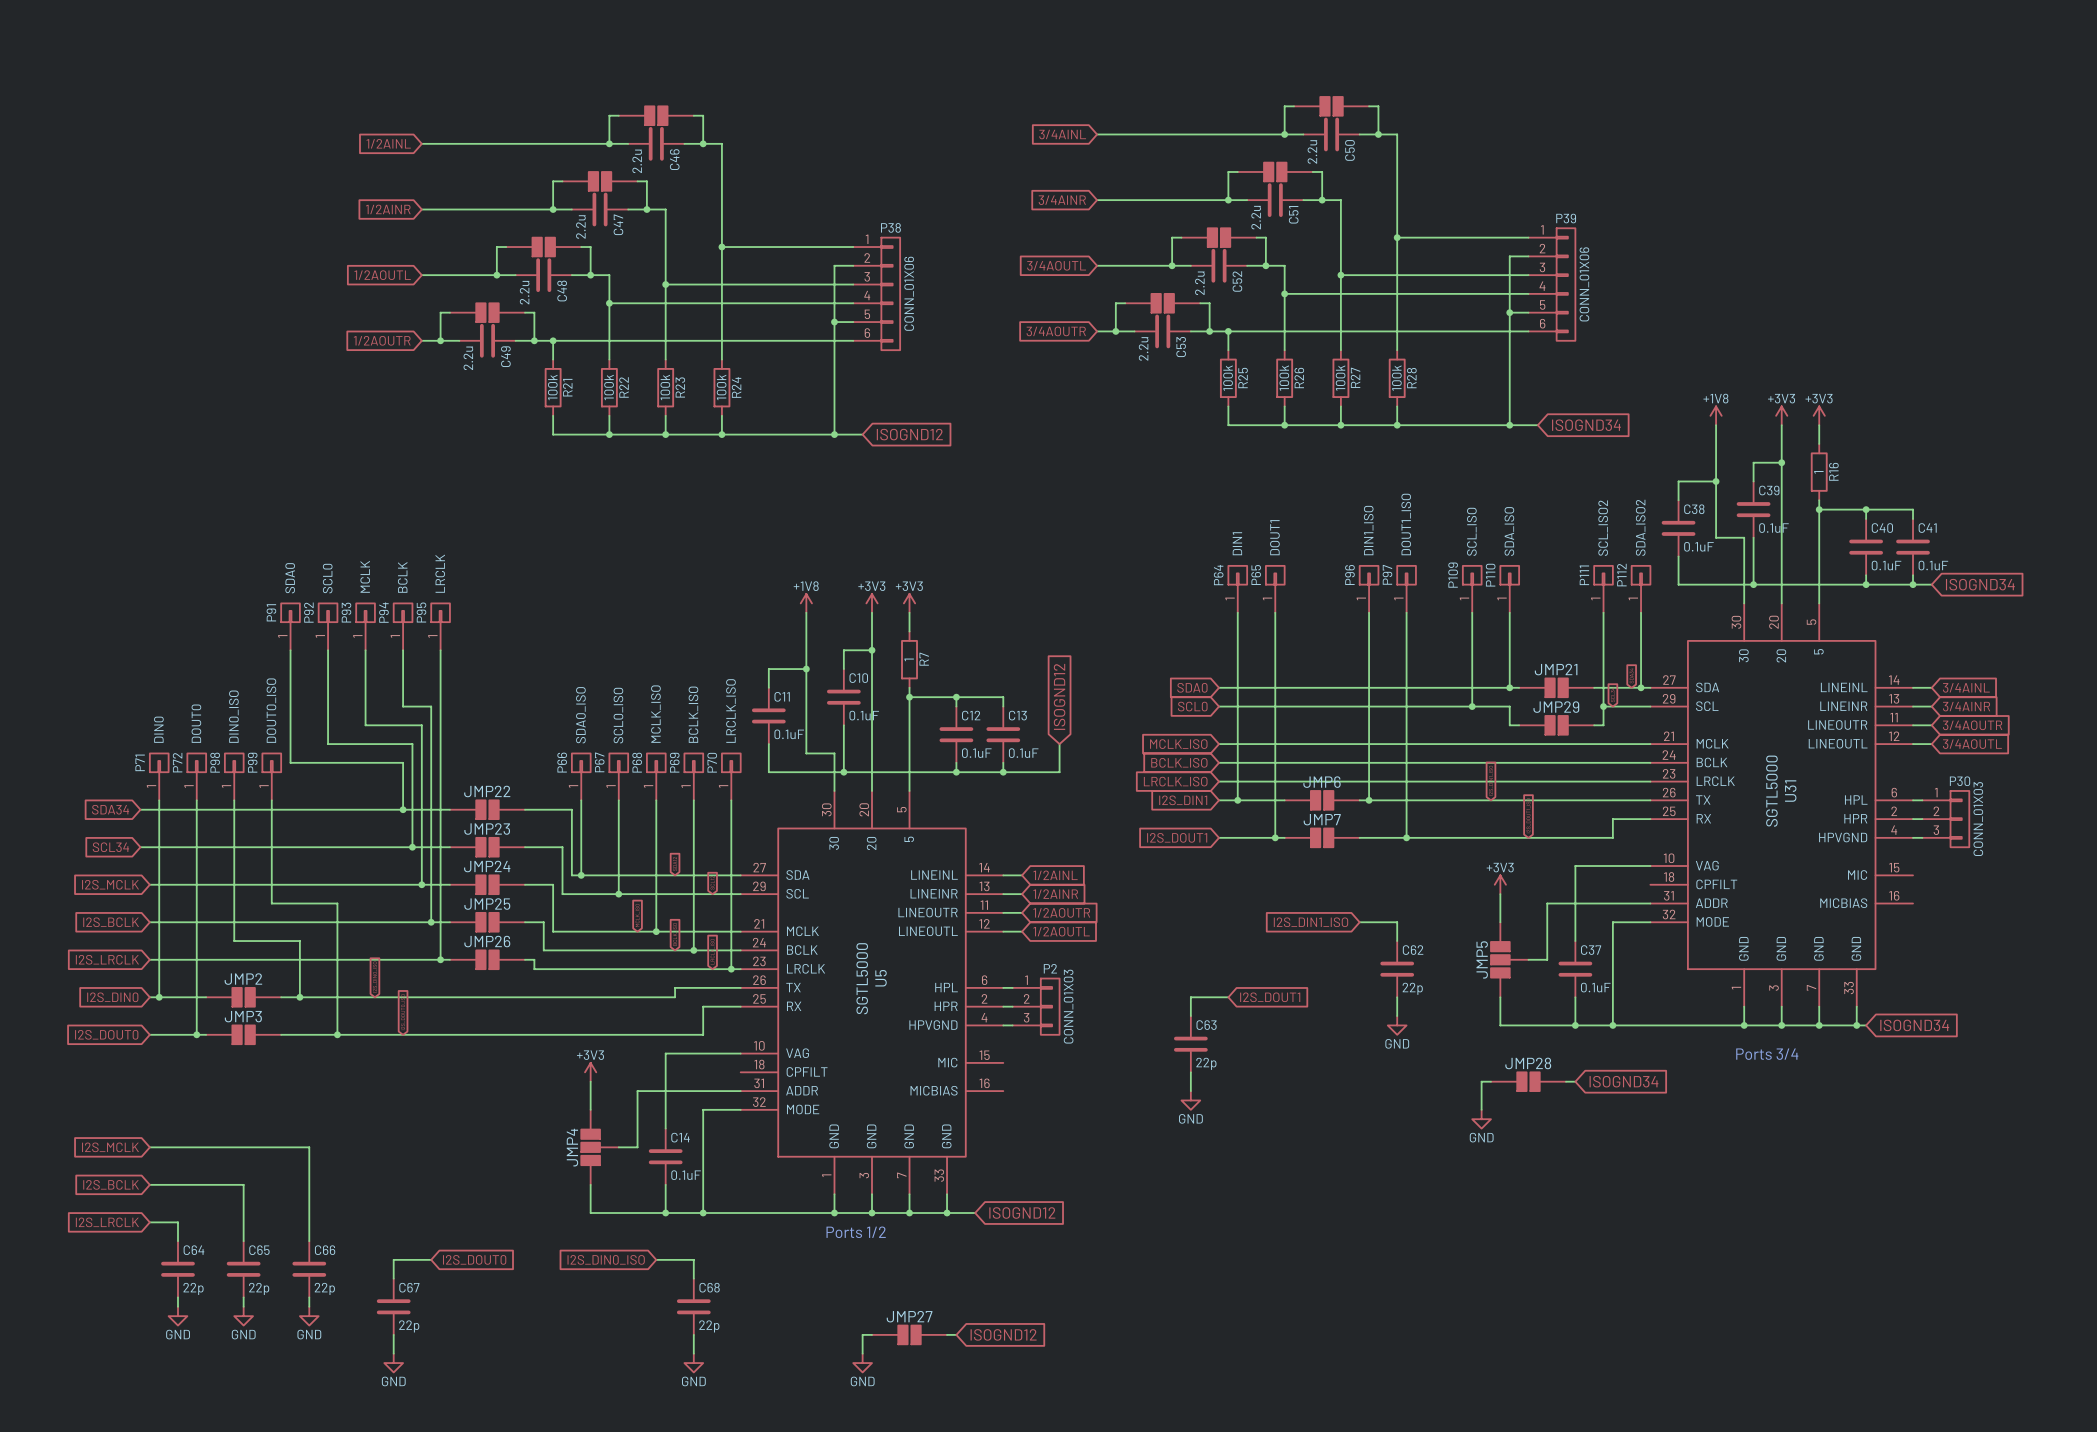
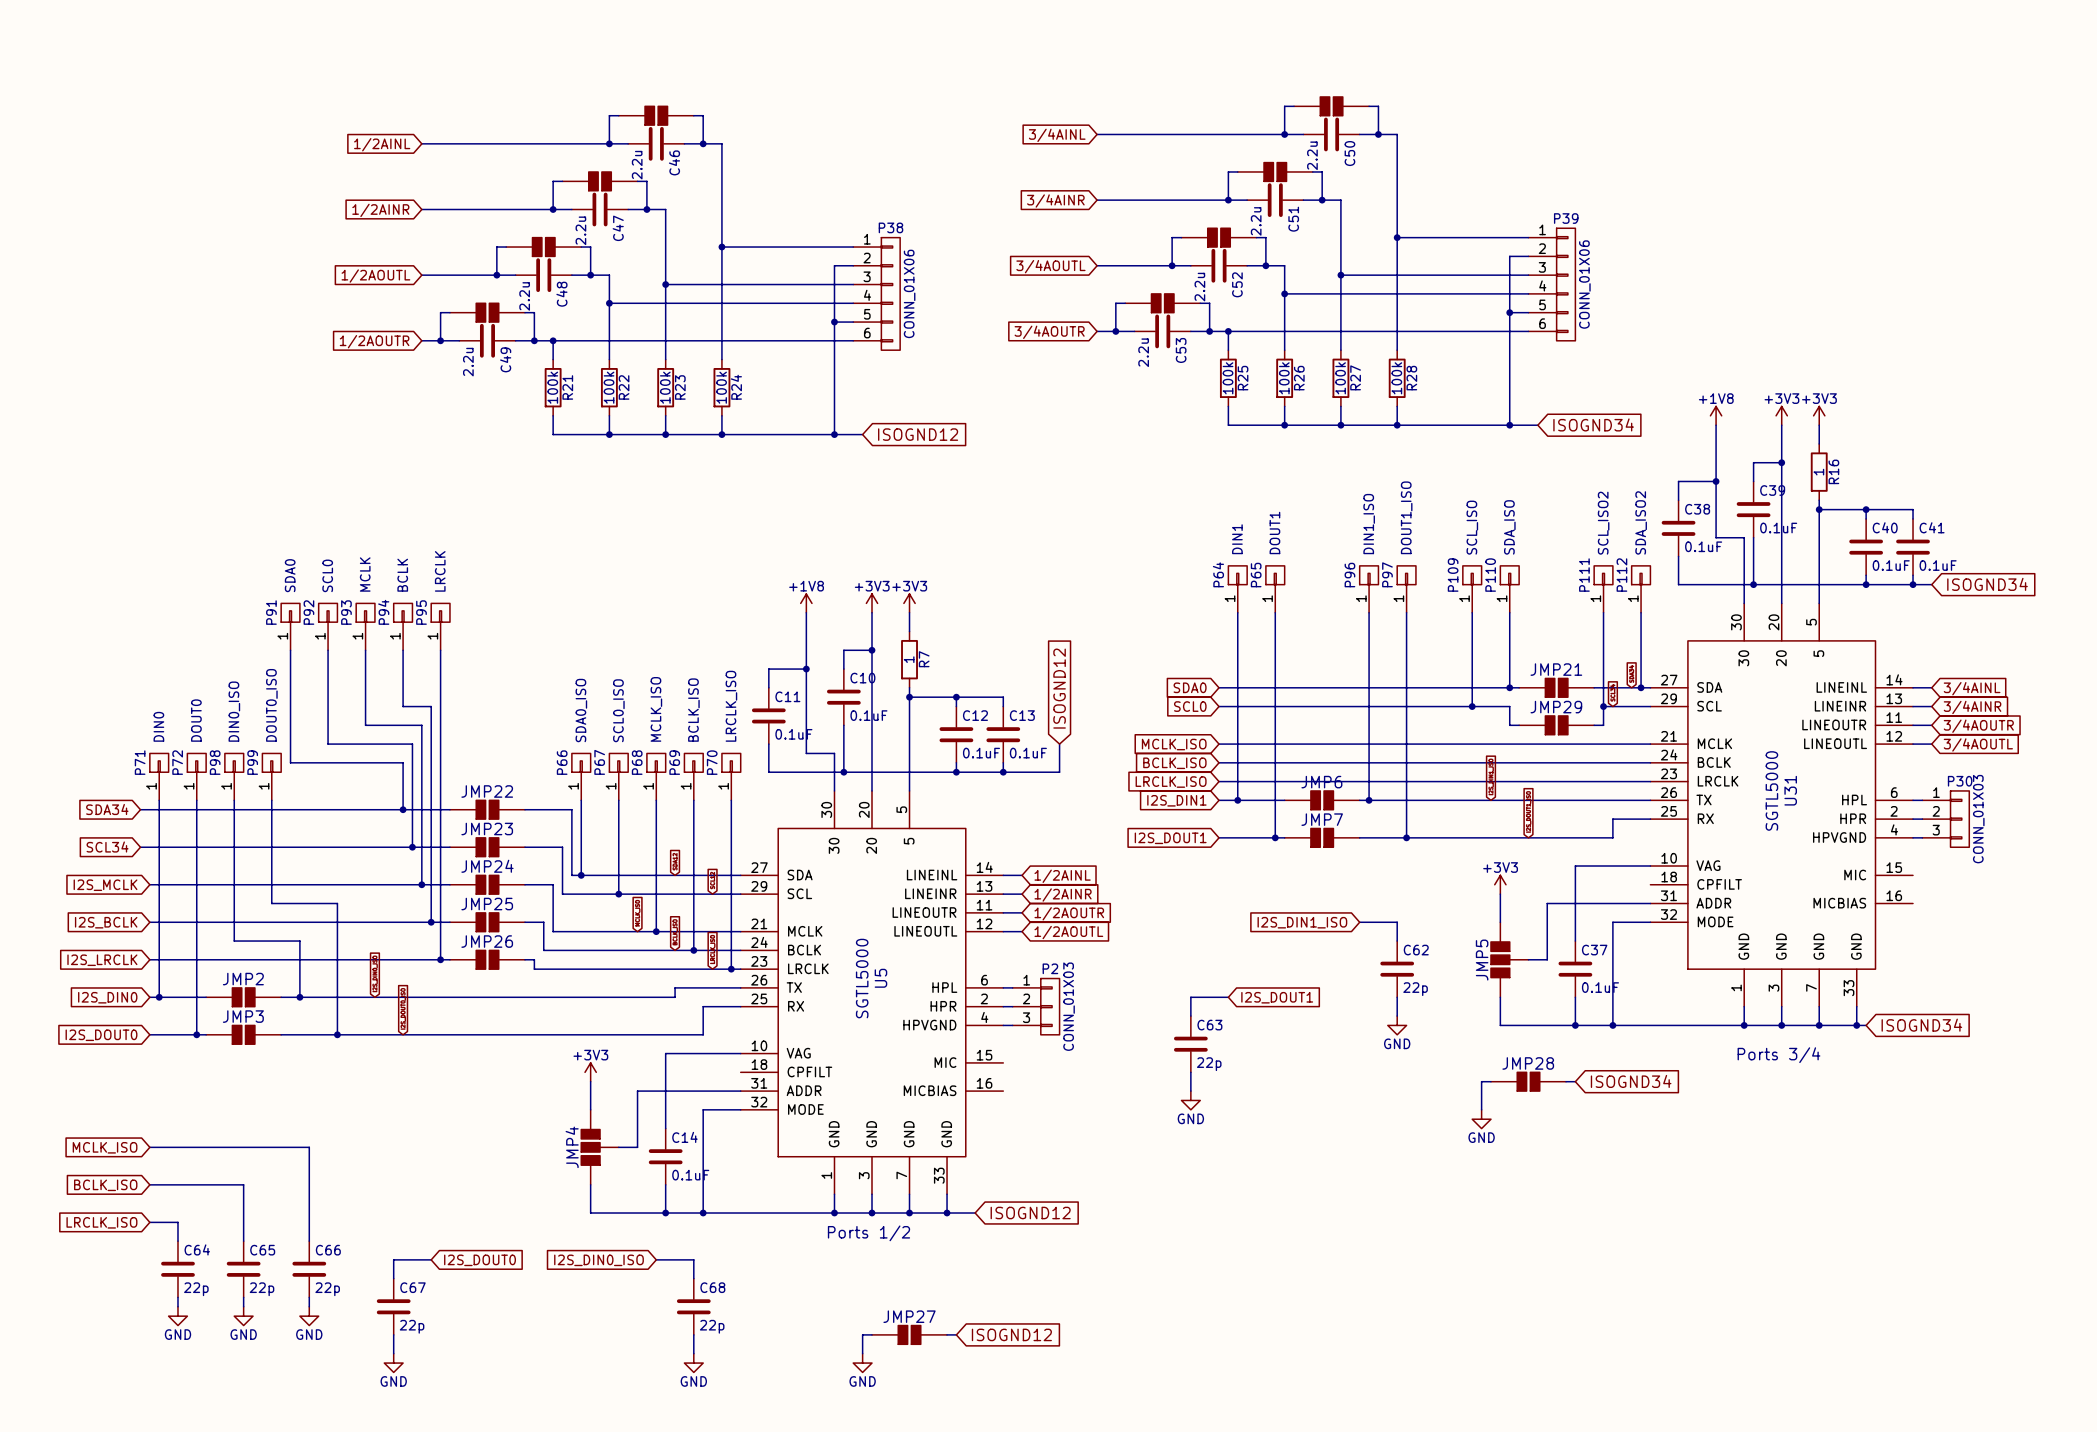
global label: I2S_MCLK (110, 1147) -> MCLK_ISO (105, 1147)
global label: I2S_BCLK (111, 1184) -> BCLK_ISO (105, 1185)
global label: I2S_LRCLK (107, 1222) -> LRCLK_ISO (101, 1222)

